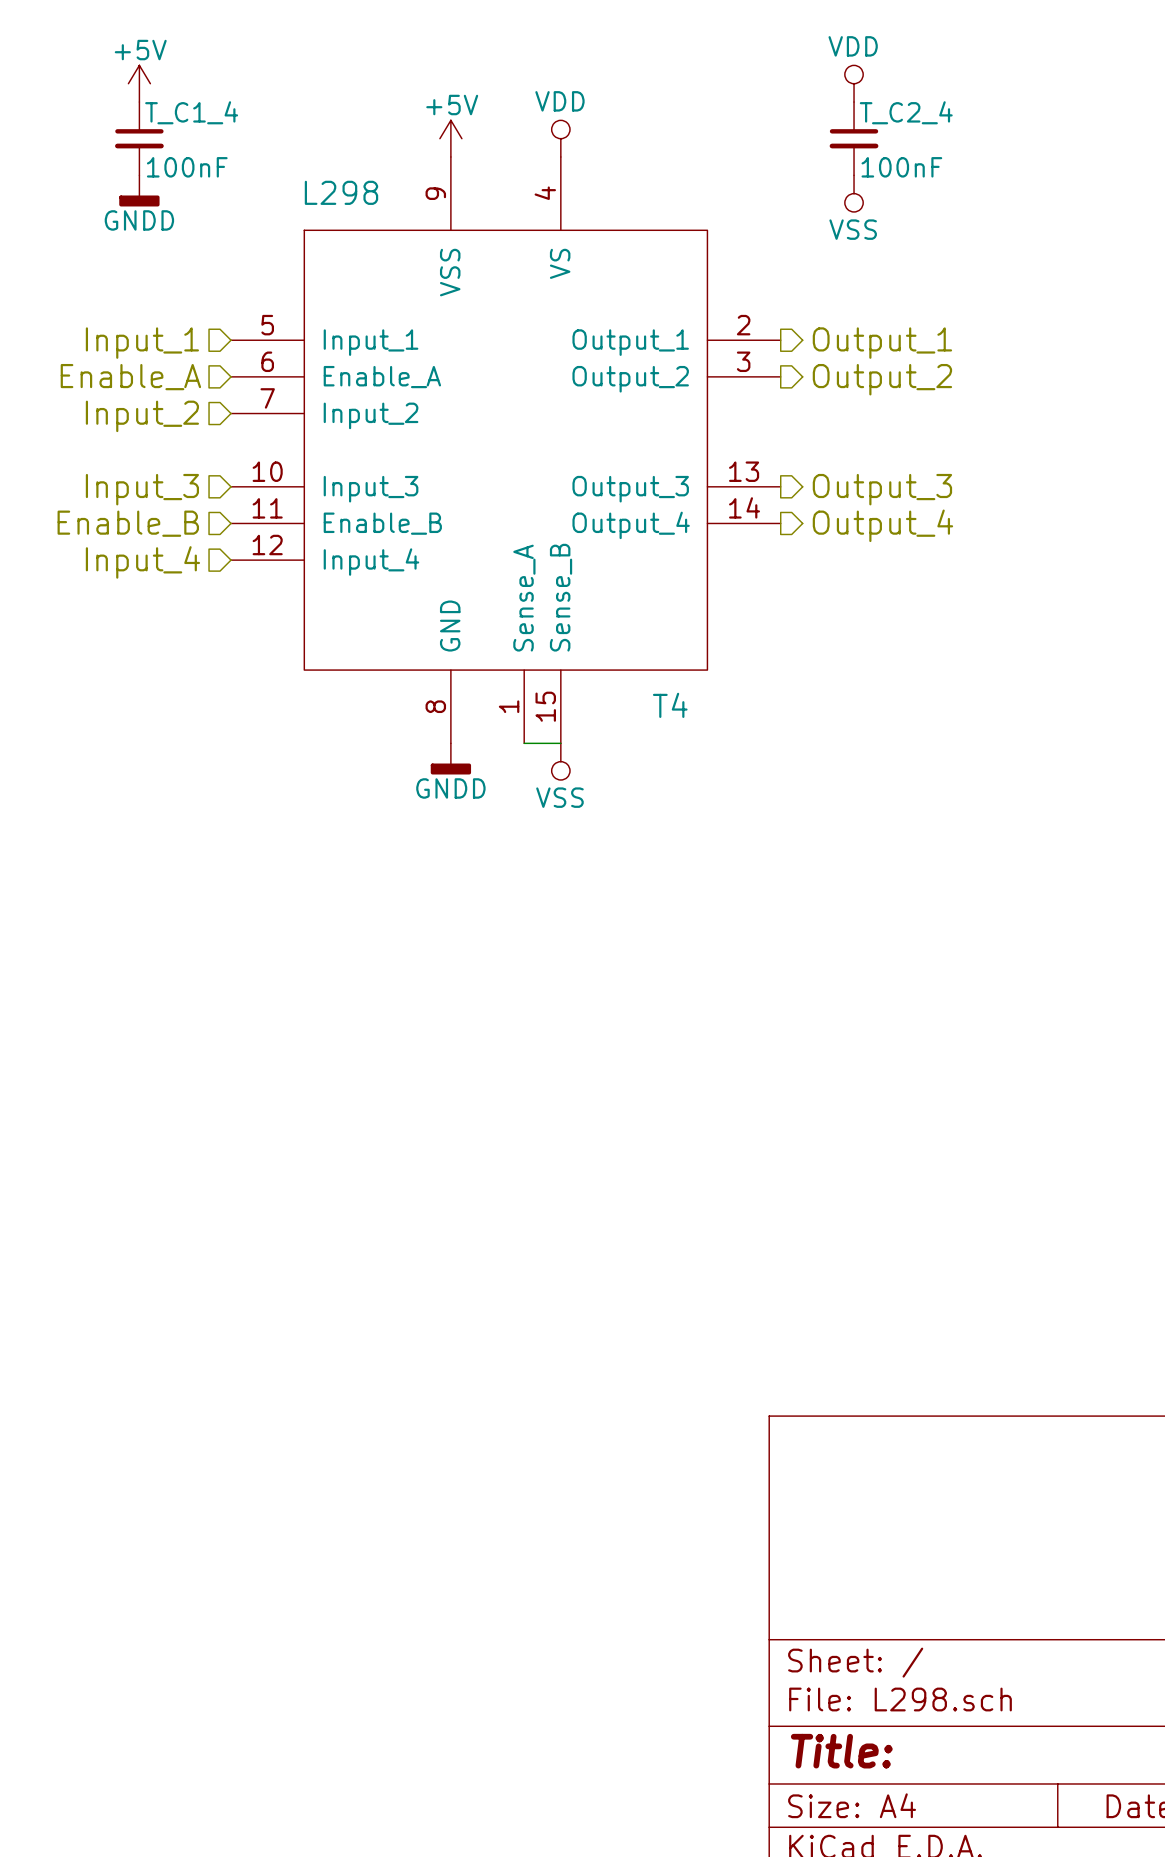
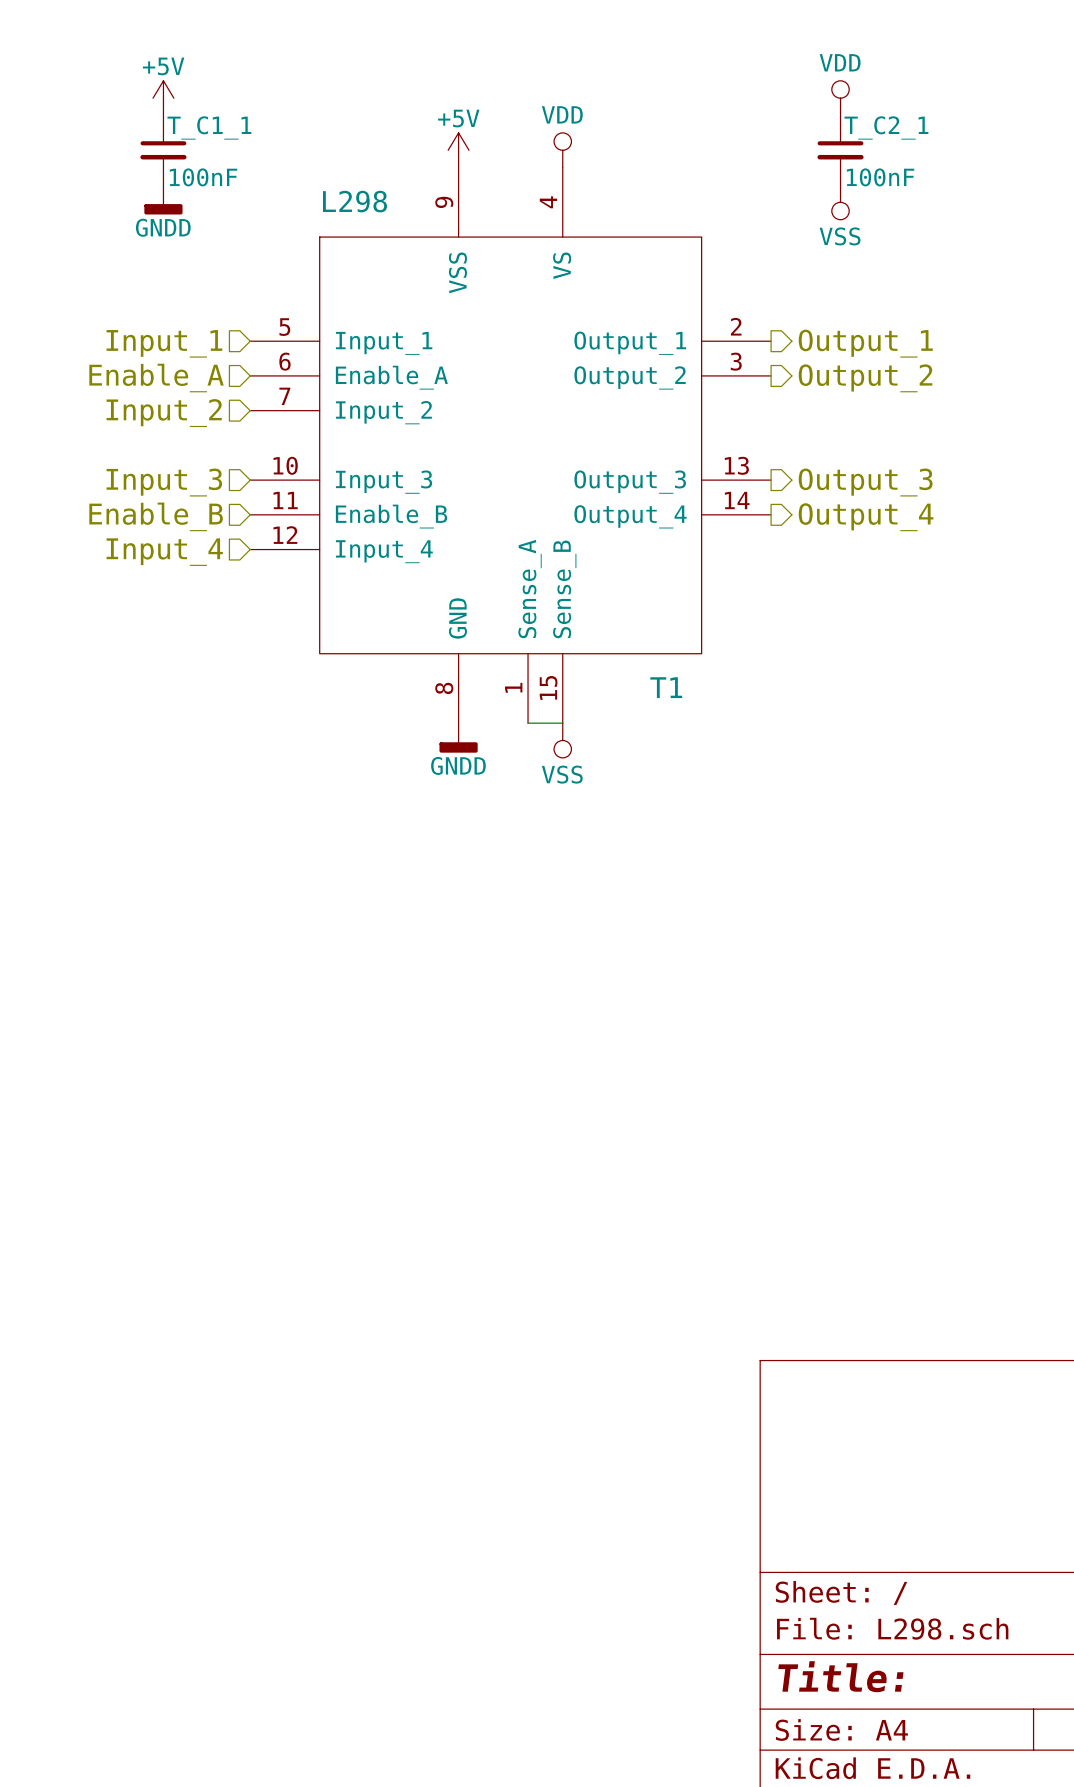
T_C1_4 name: T_C1_4 (191, 112) -> T_C1_1 (209, 127)
T_C2_4 name: T_C2_4 (906, 112) -> T_C2_1 (886, 127)
T4 name: T4 (670, 705) -> T1 (666, 687)

